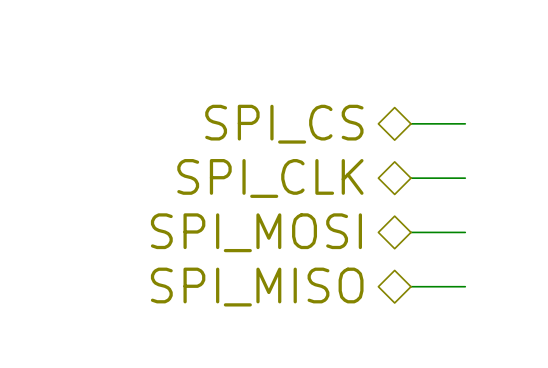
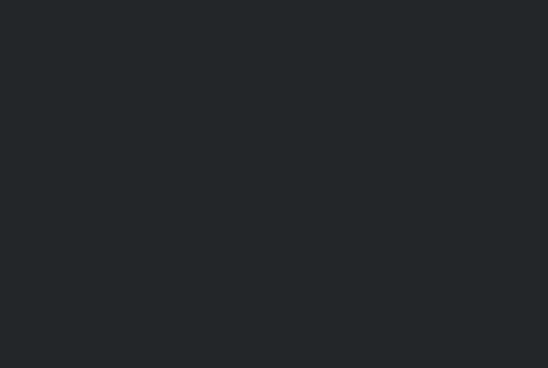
wire: (410, 123) (465, 123) -> none
hierarchical label: SPI_CS (284, 124) -> none
hierarchical label: SPI_CLK (270, 178) -> none
wire: (410, 178) (465, 178) -> none
hierarchical label: SPI_MOSI (256, 232) -> none
wire: (410, 232) (465, 232) -> none
wire: (410, 286) (465, 286) -> none
hierarchical label: SPI_MISO (257, 287) -> none

